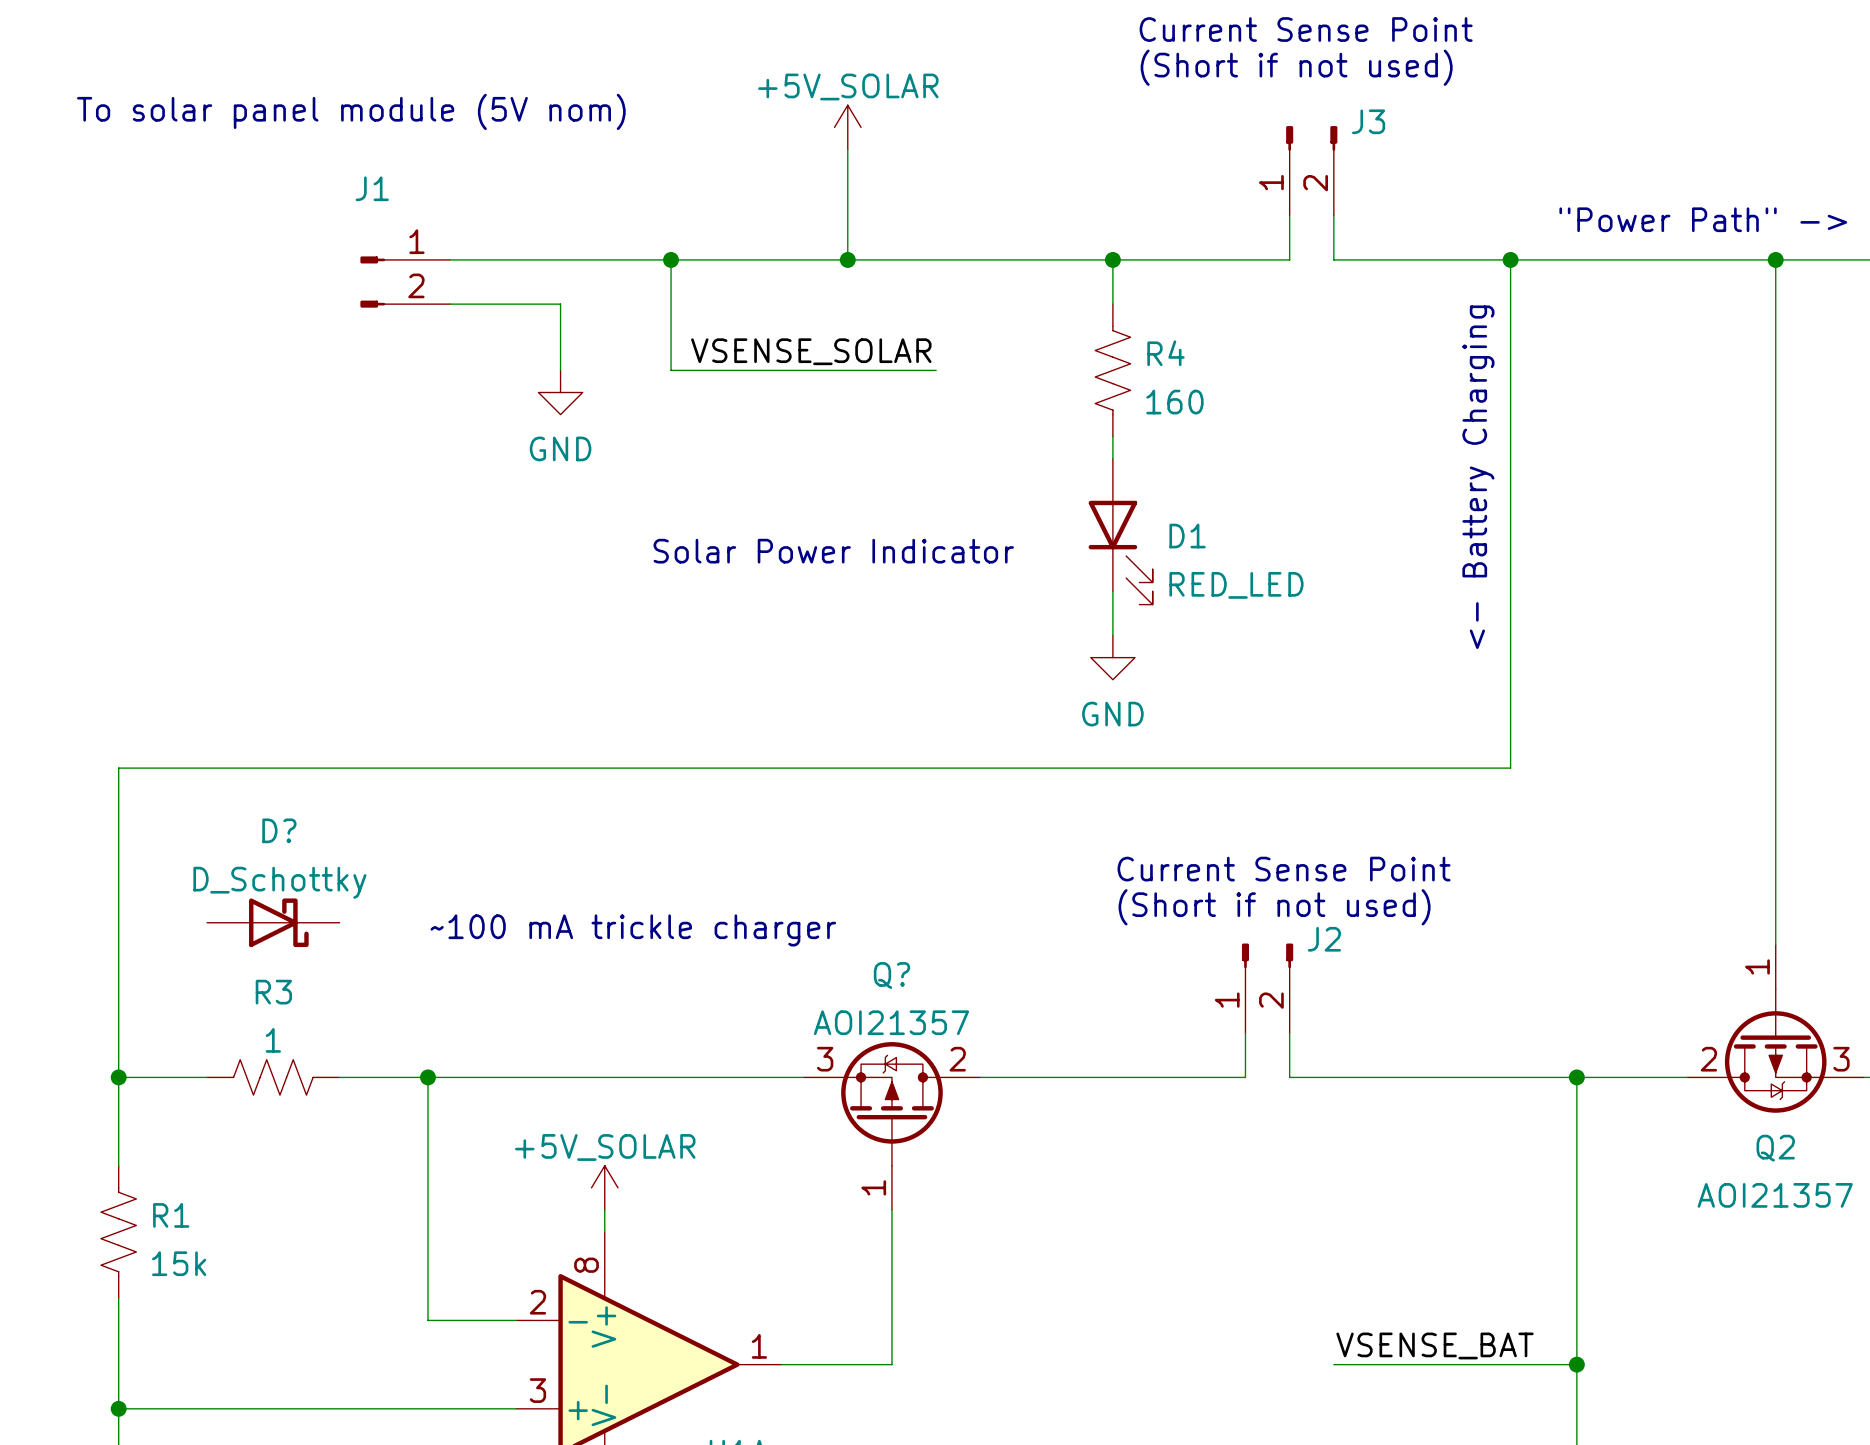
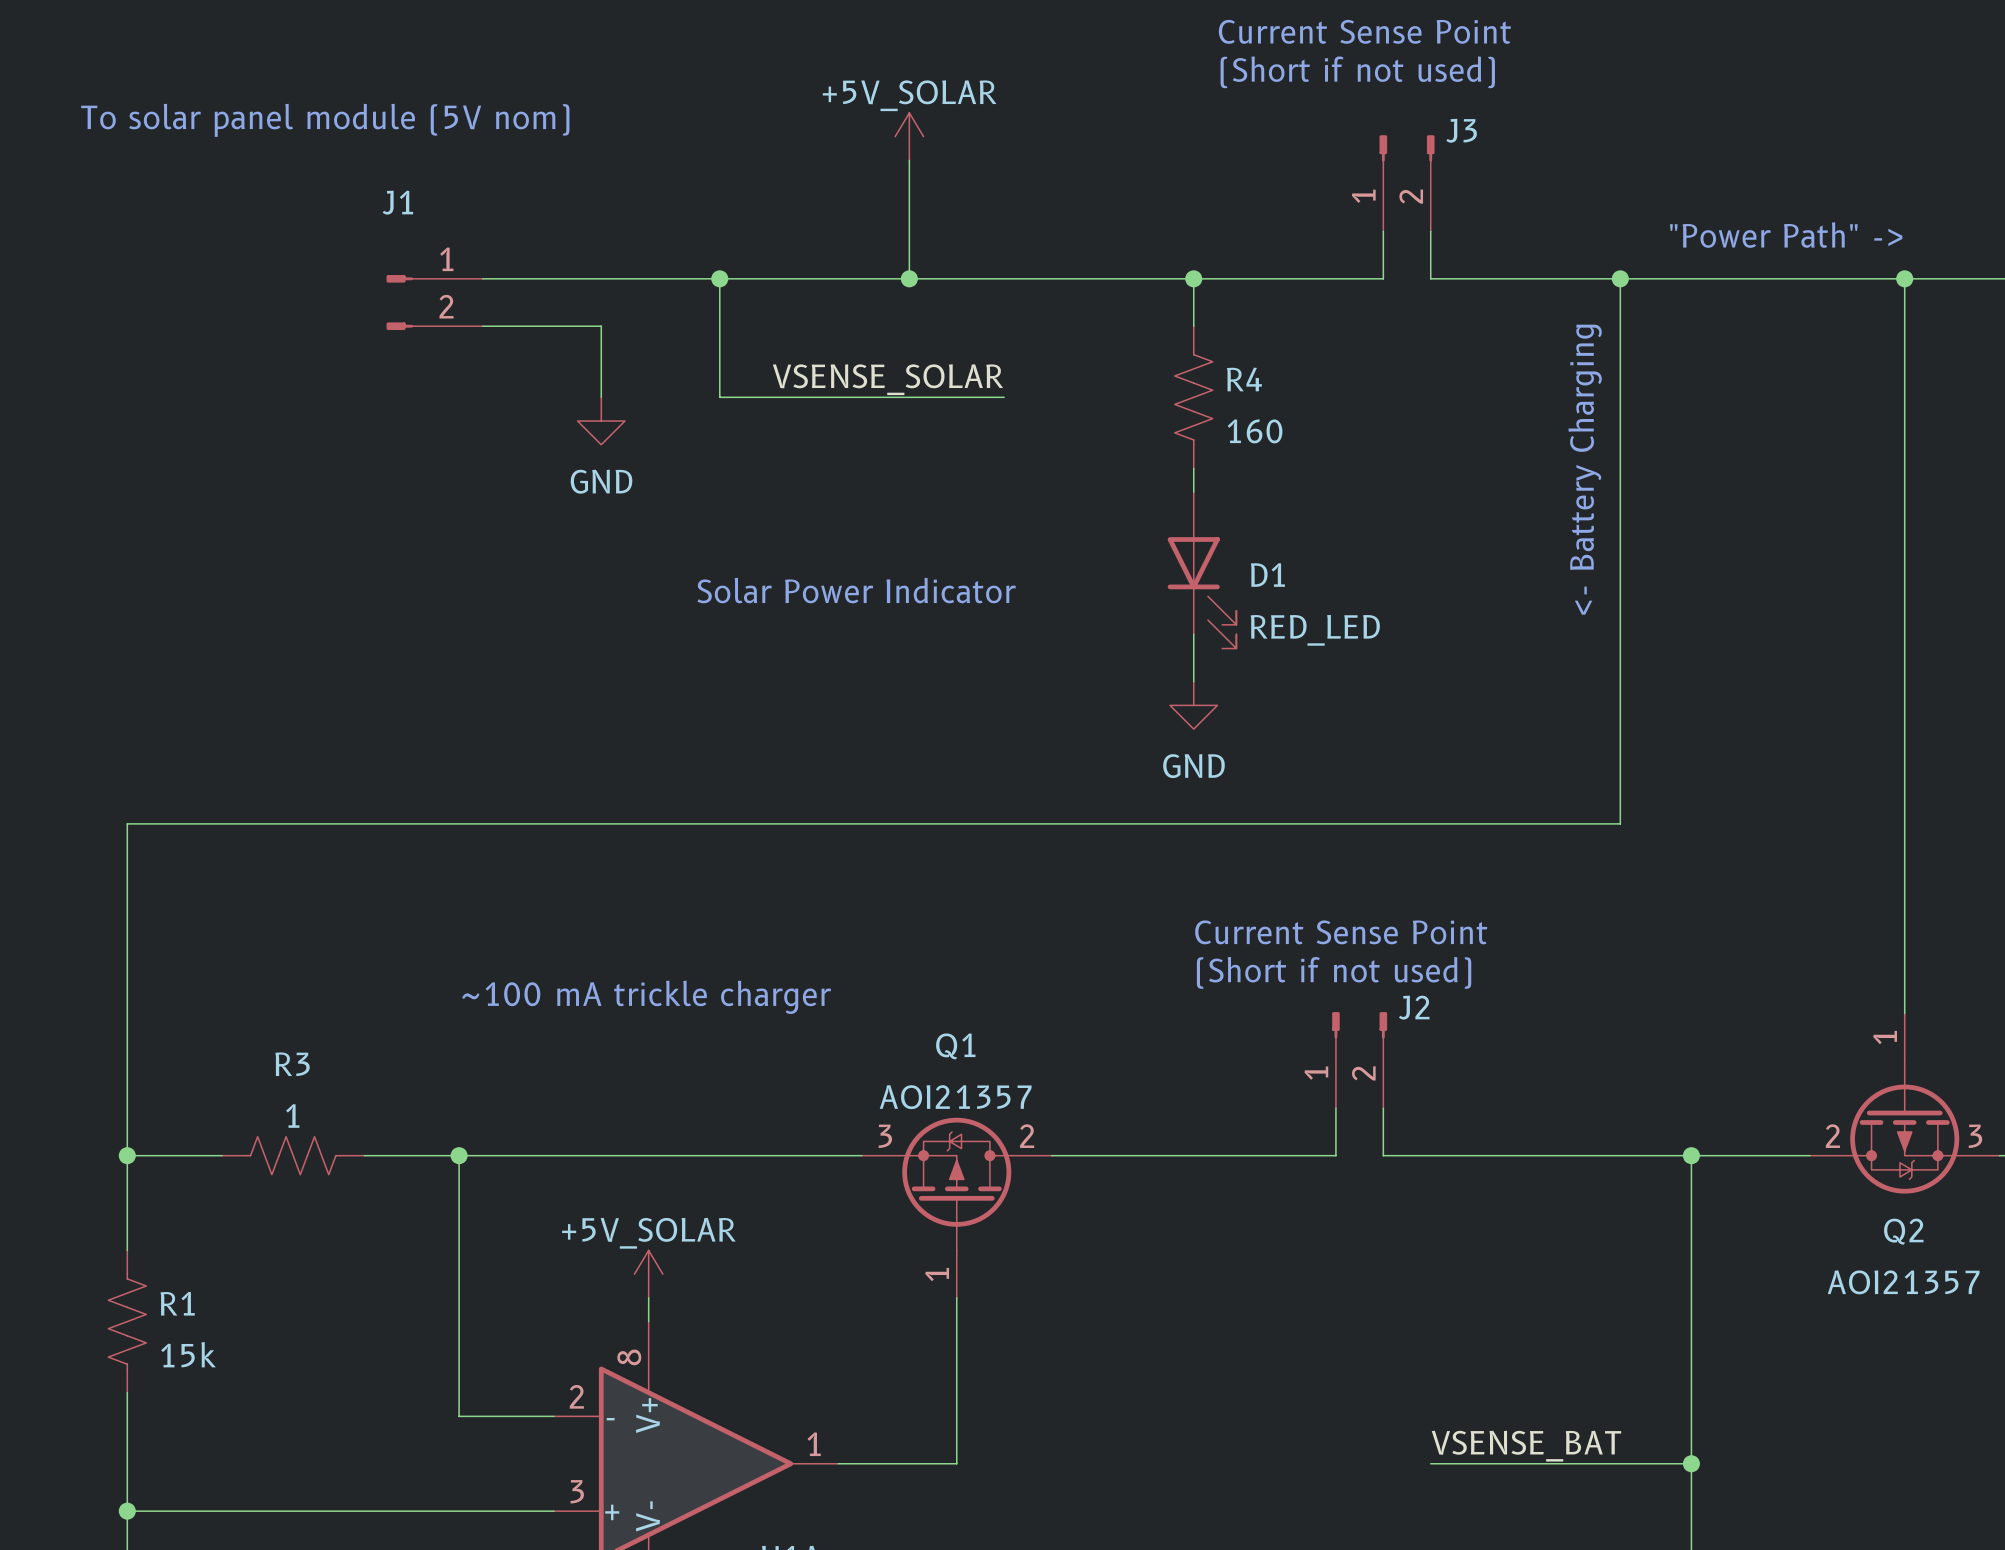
D?: D_Schottky (273, 922) -> none
Q? name: Q? (891, 975) -> Q1 (955, 1046)

